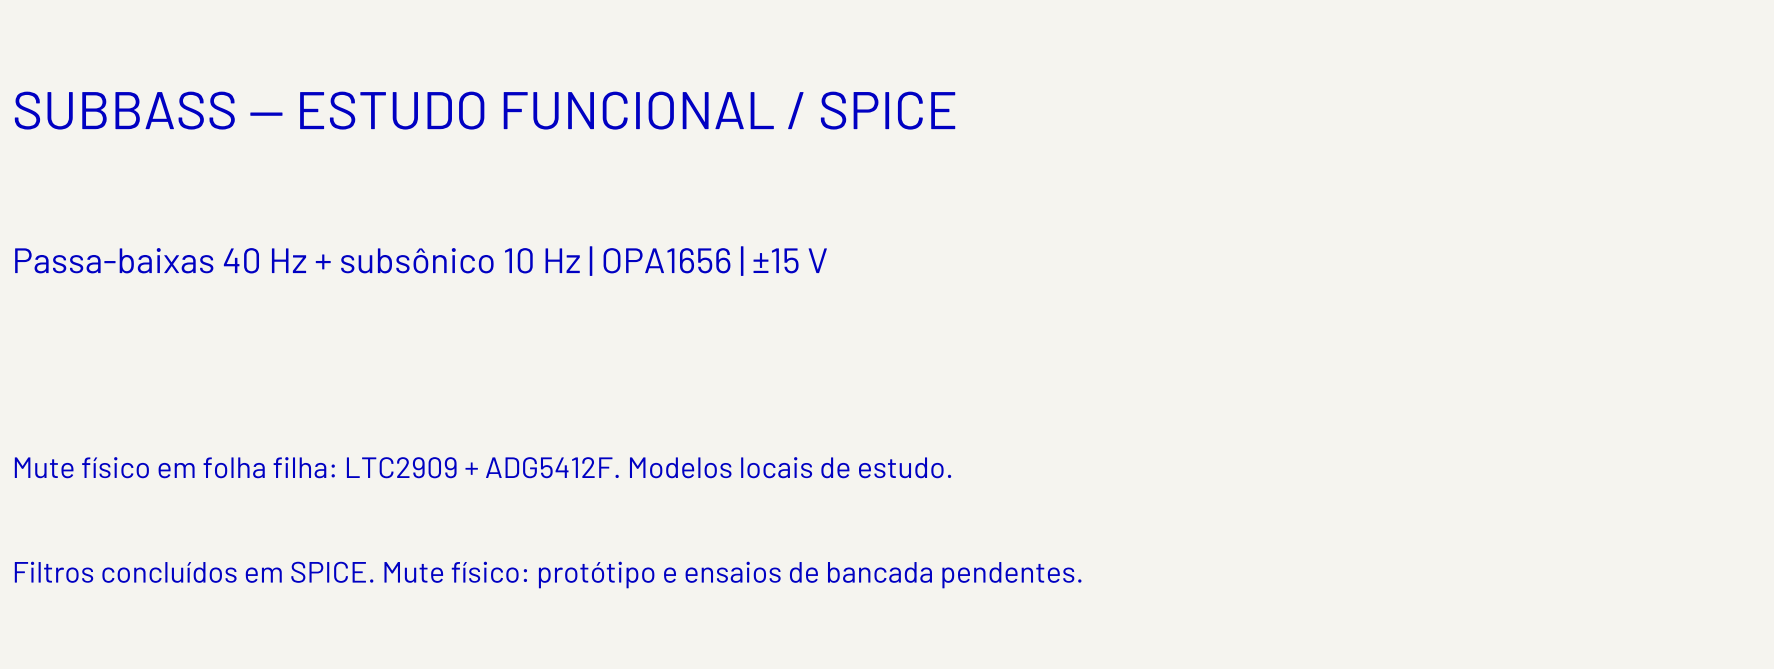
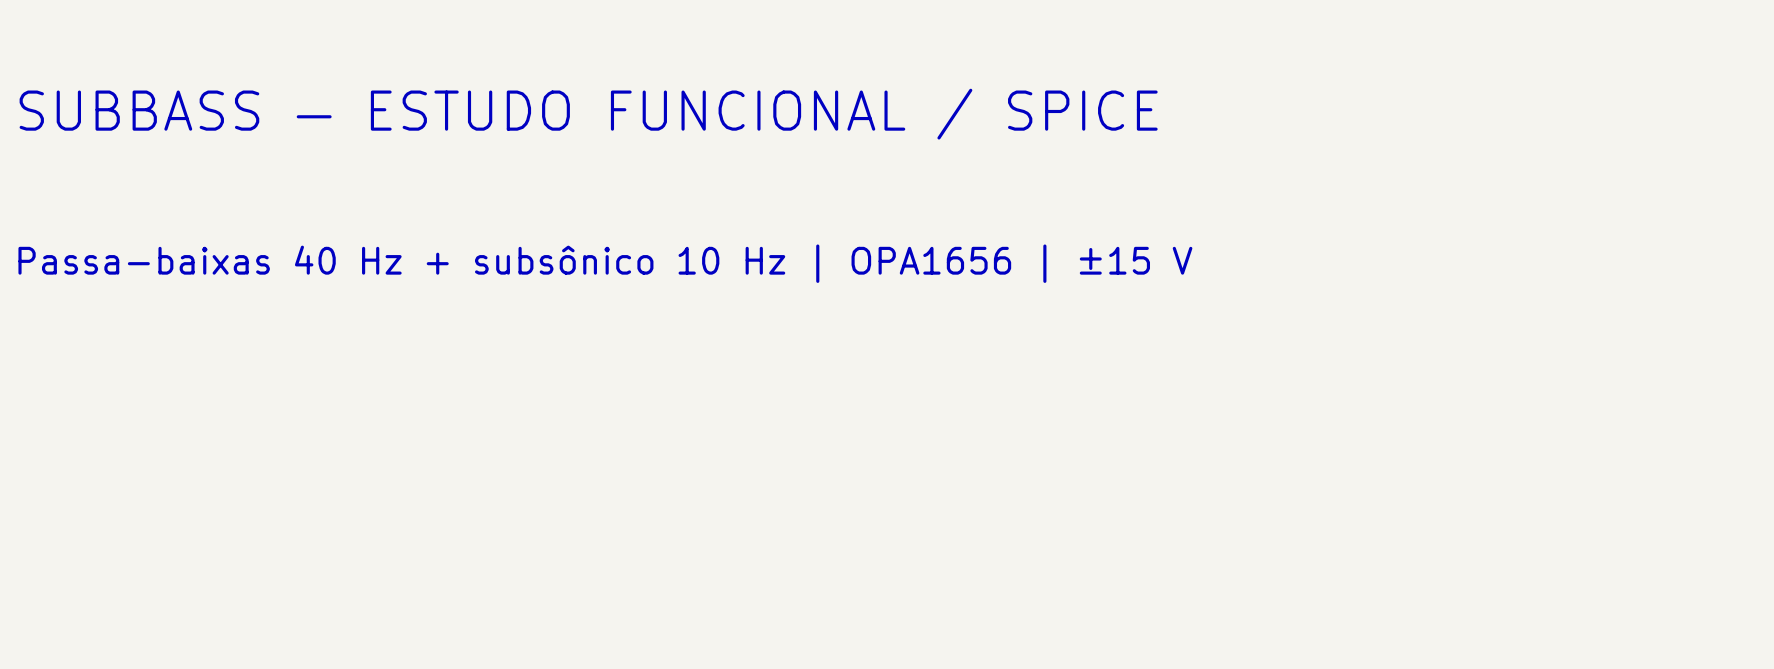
text: Mute físico em folha filha: LTC2909 + ADG5412F. Modelos locais de estudo. (483, 467) -> none
text: Filtros concluídos em SPICE. Mute físico: protótipo e ensaios de bancada pendentes. (548, 575) -> none

